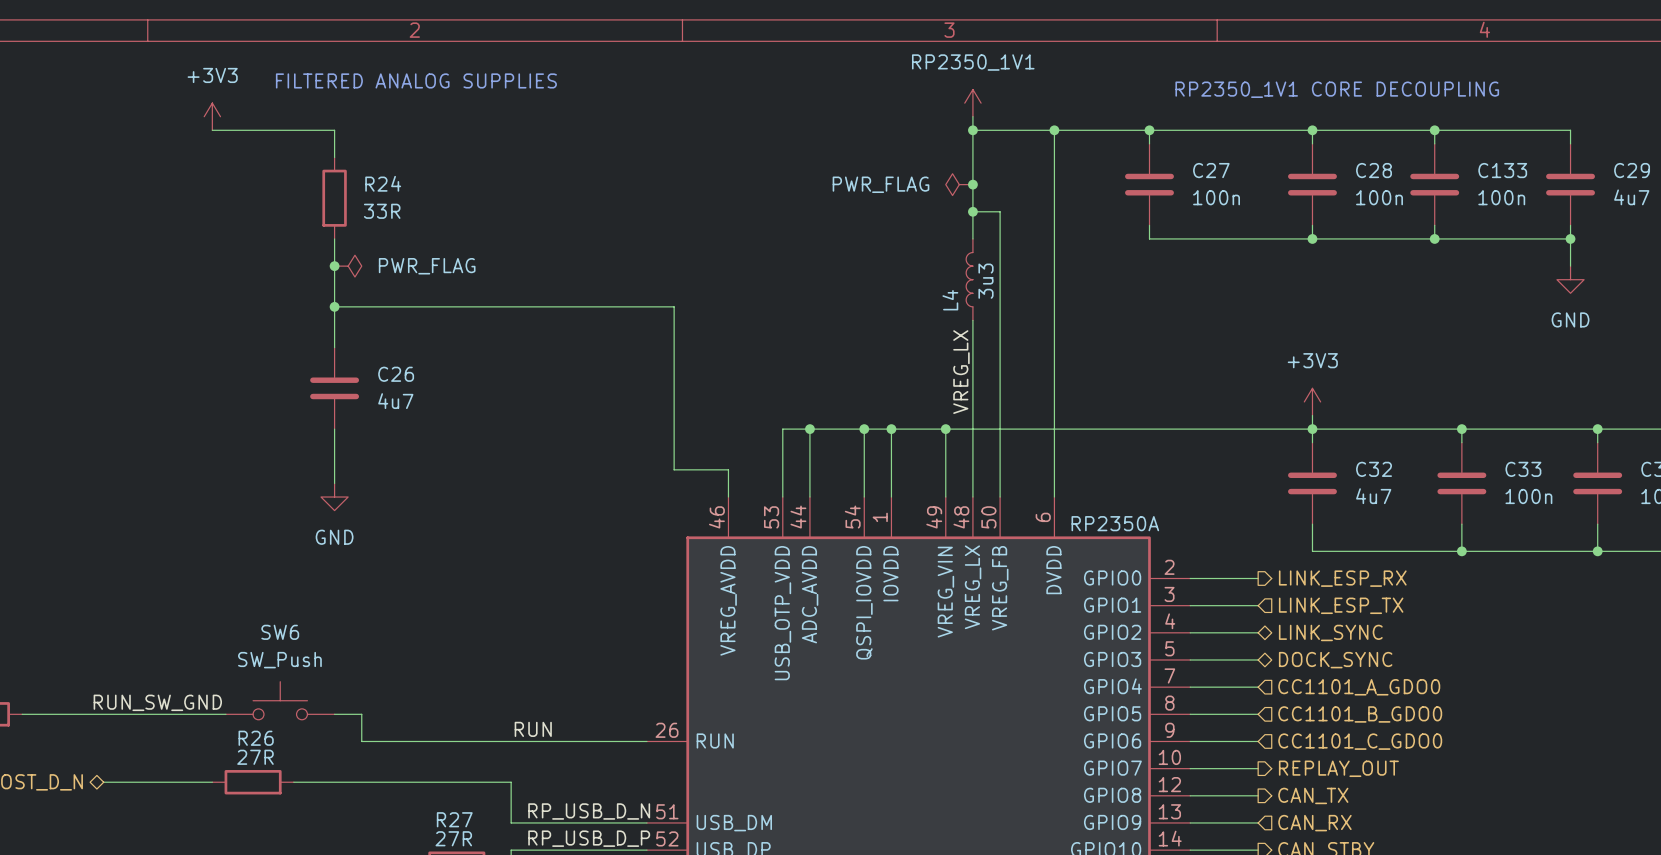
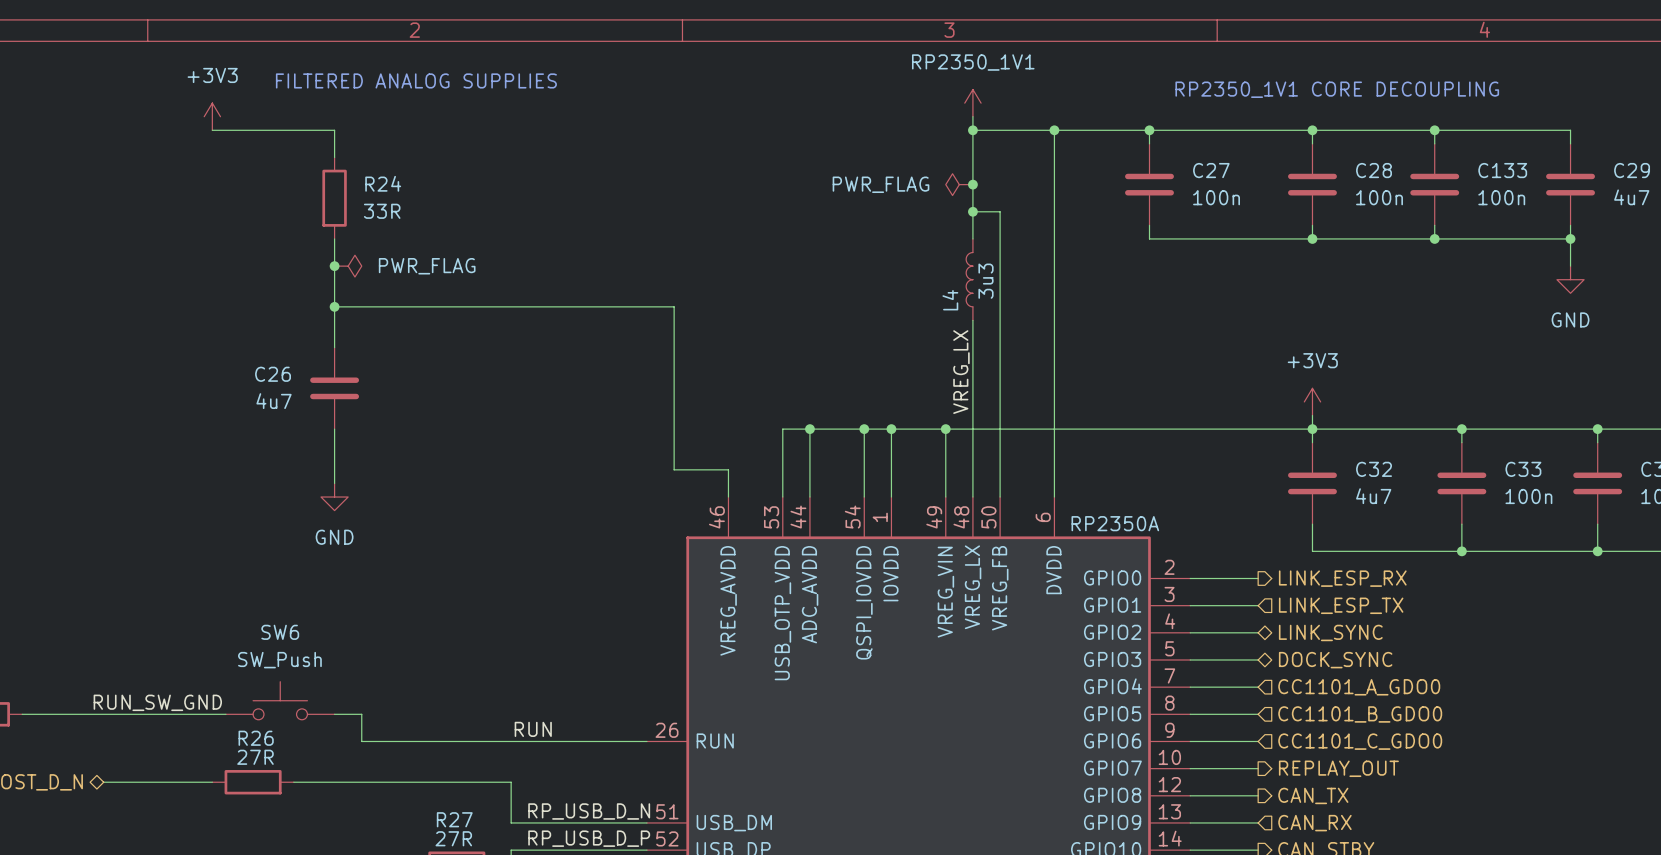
C26 name position: C26 (396, 374) -> C26 (273, 374)
C26 value position: 4u7 (395, 401) -> 4u7 (274, 401)

